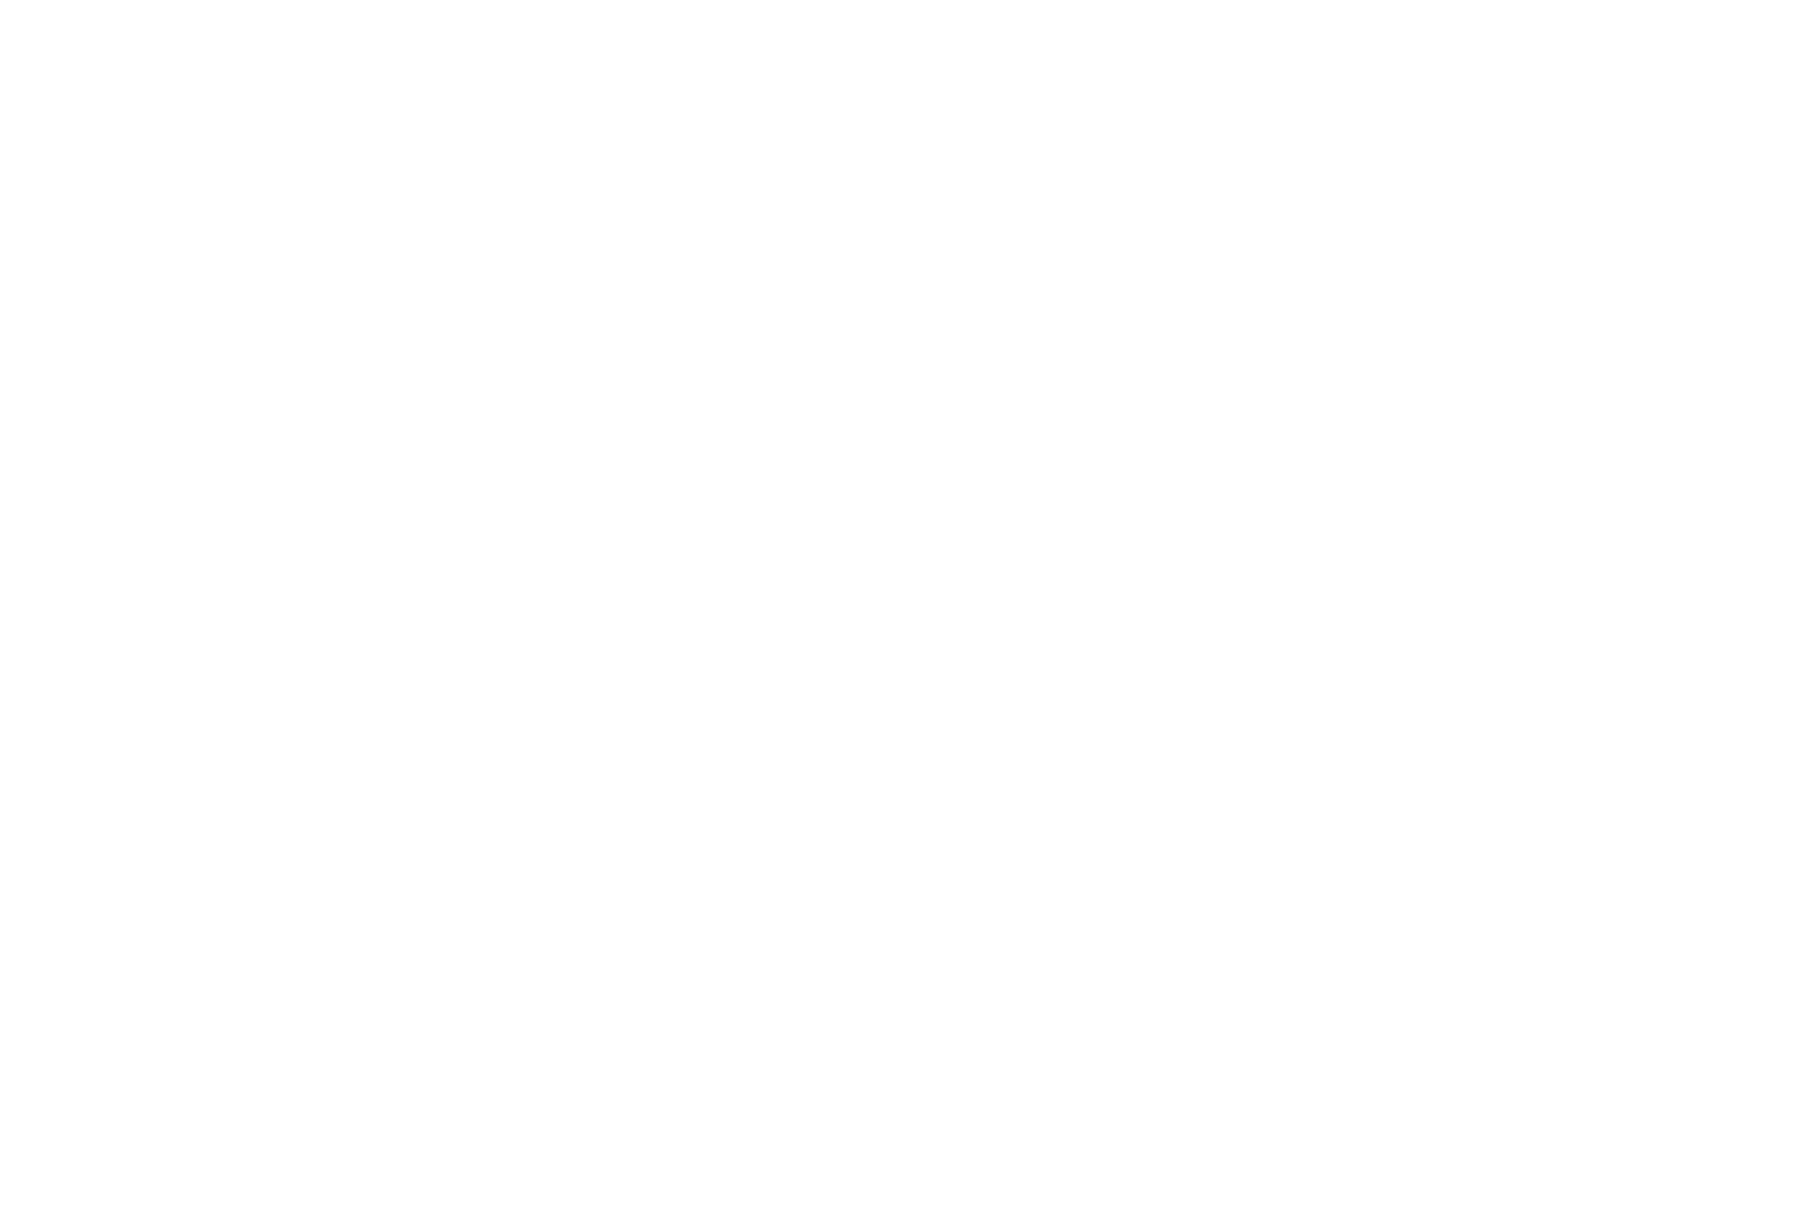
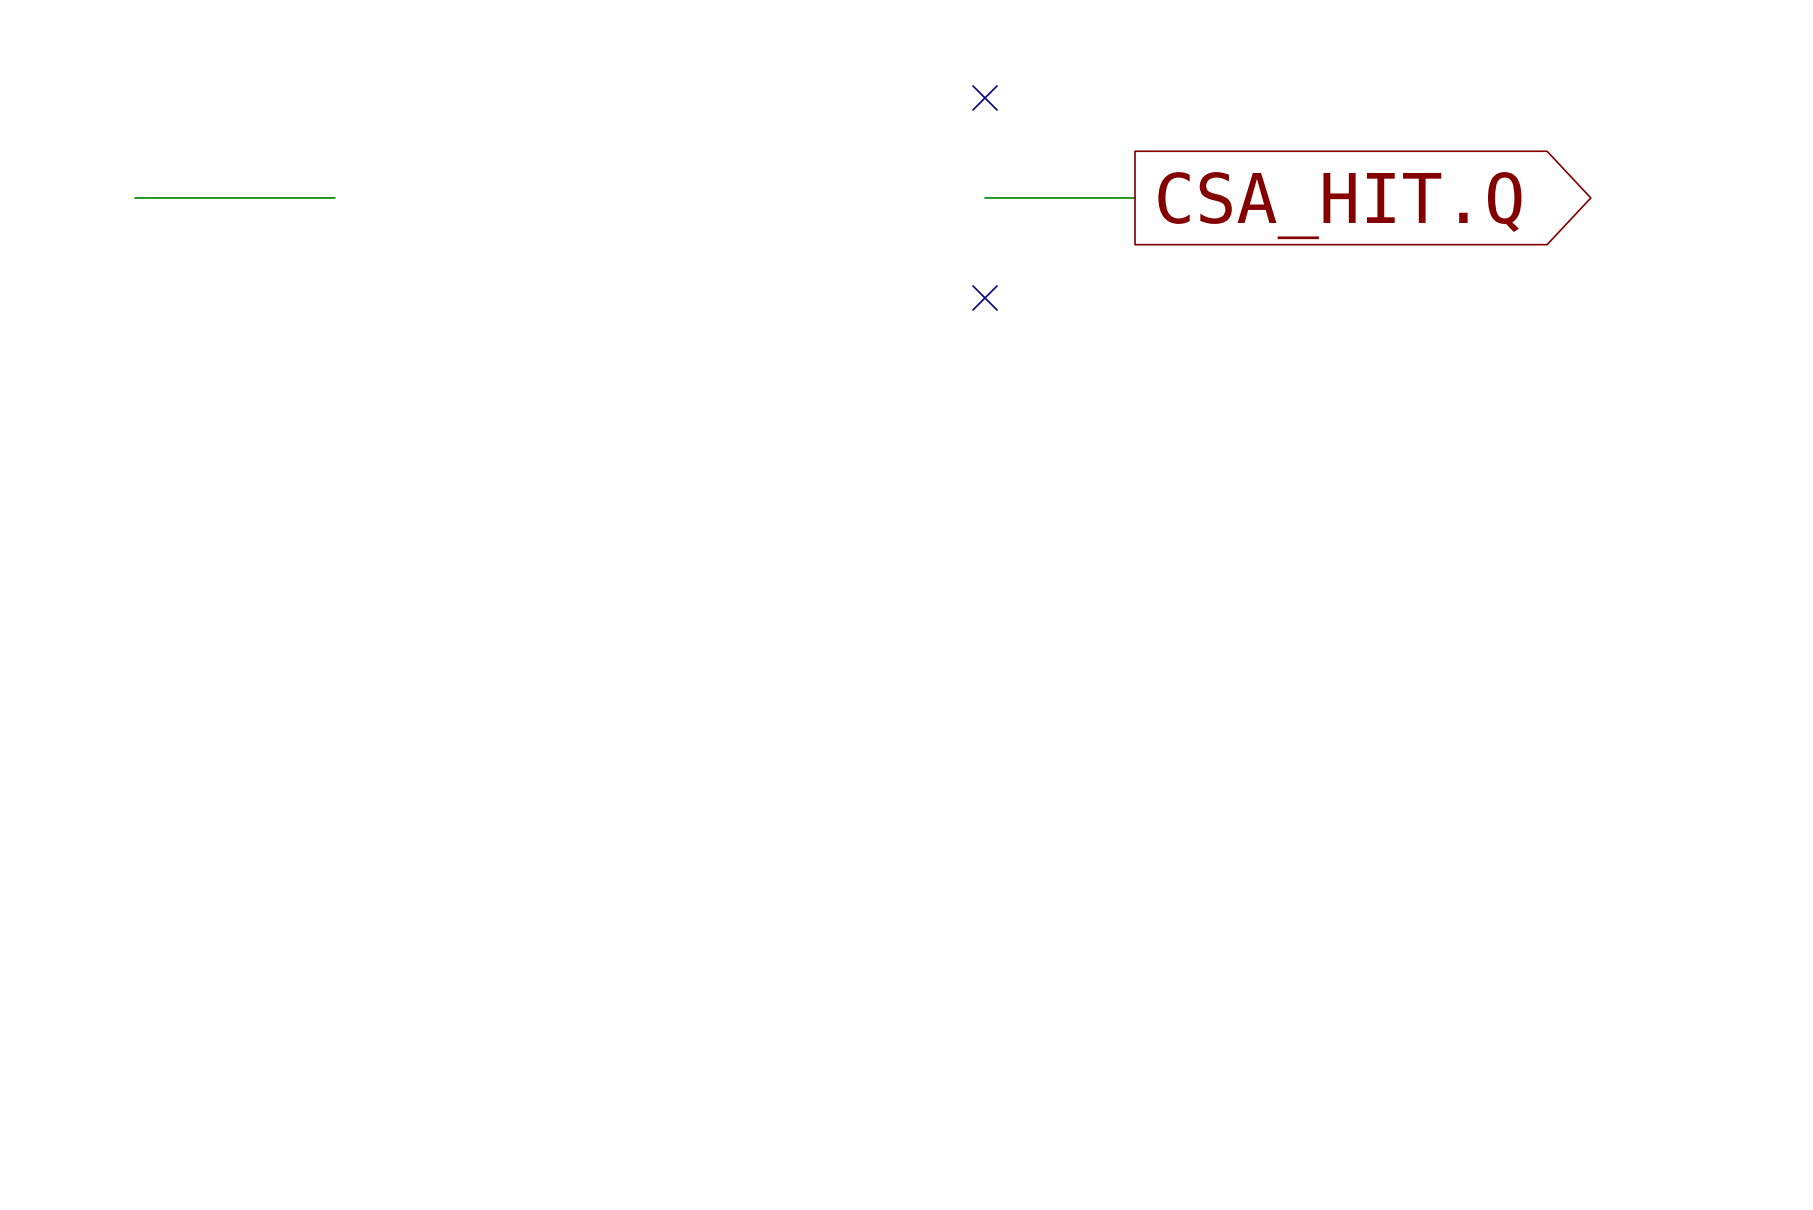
no-connect mark: none -> (984, 97)
wire: none -> (134, 197) (334, 197)
wire: none -> (984, 197) (1135, 197)
global label: none -> CSA_HIT.Q (1339, 205)
no-connect mark: none -> (984, 297)

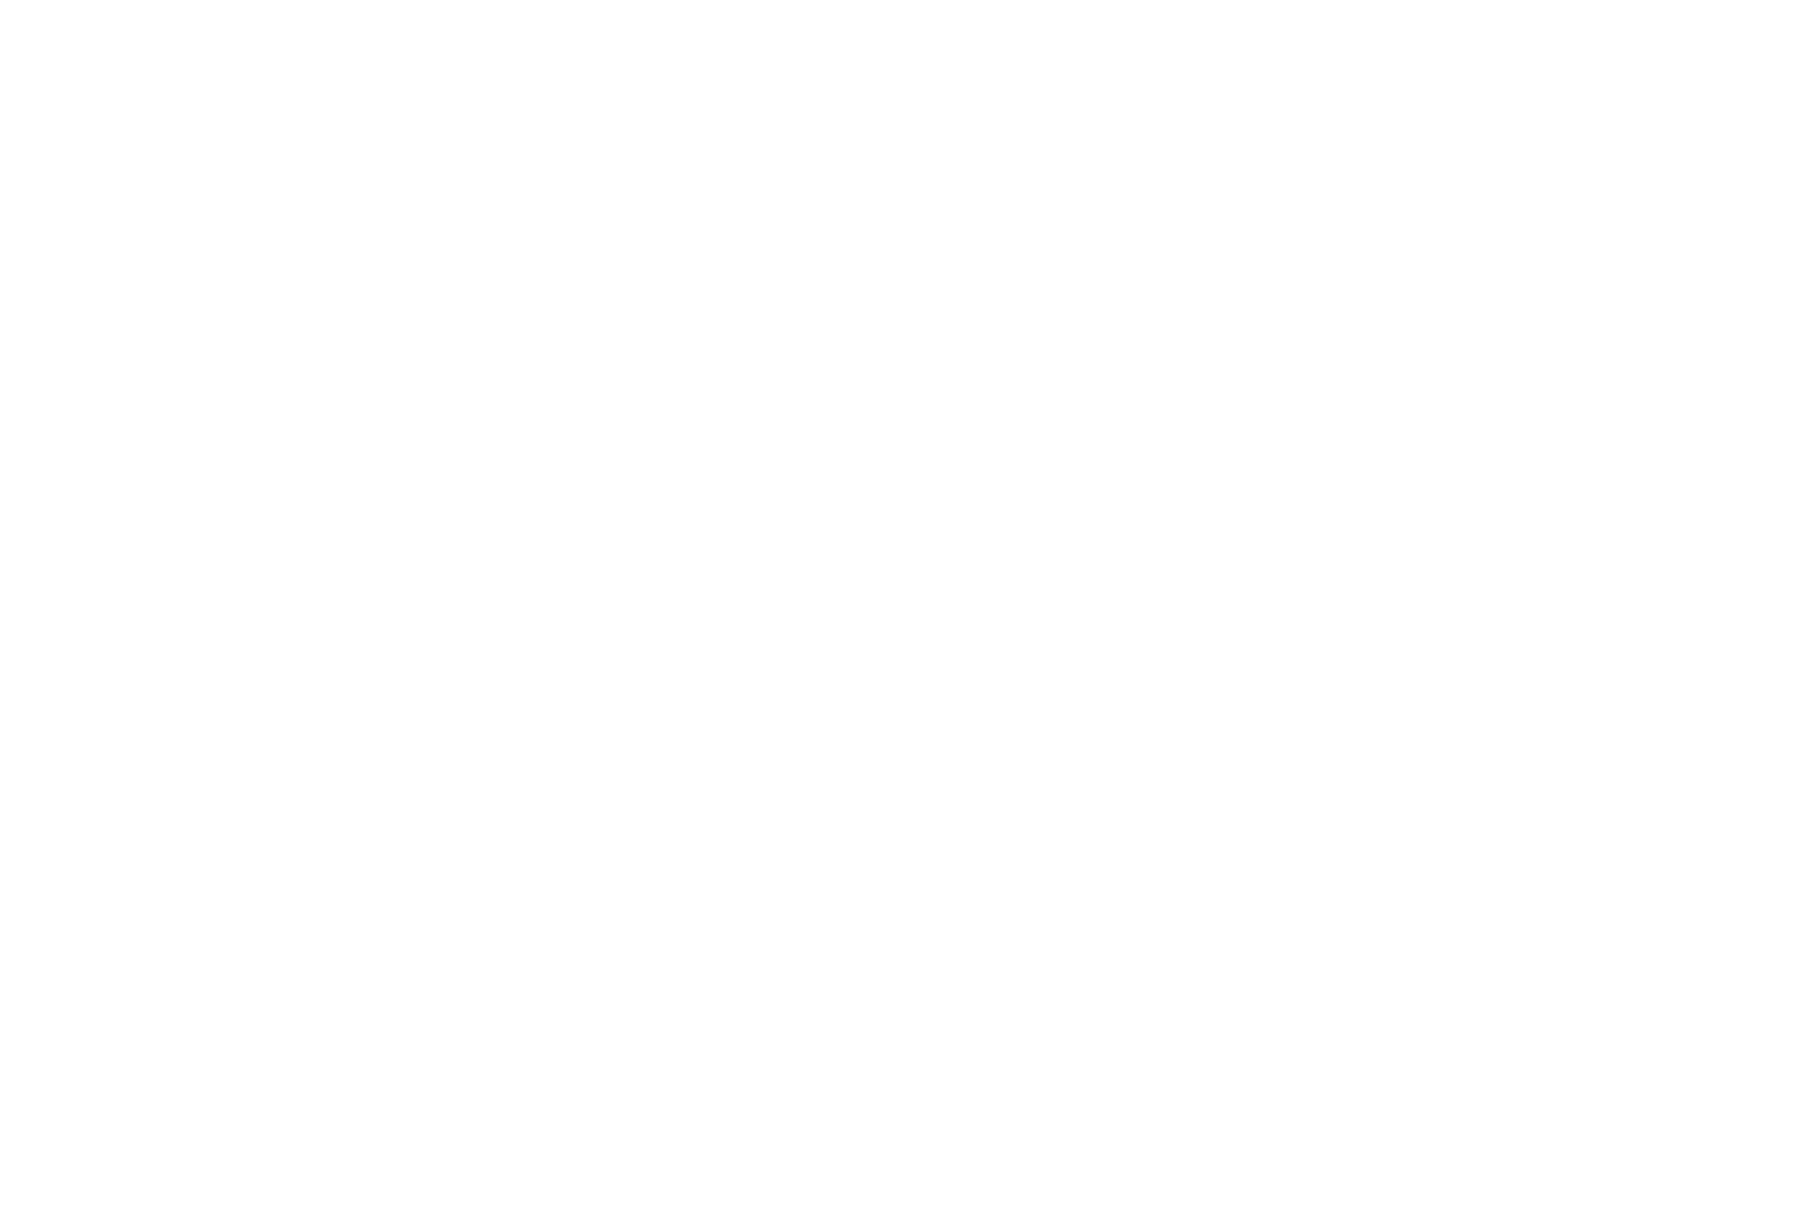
no-connect mark: (984, 97) -> none
wire: (134, 197) (334, 197) -> none
wire: (984, 197) (1135, 197) -> none
global label: CSA_HIT.Q (1339, 205) -> none
no-connect mark: (984, 297) -> none

